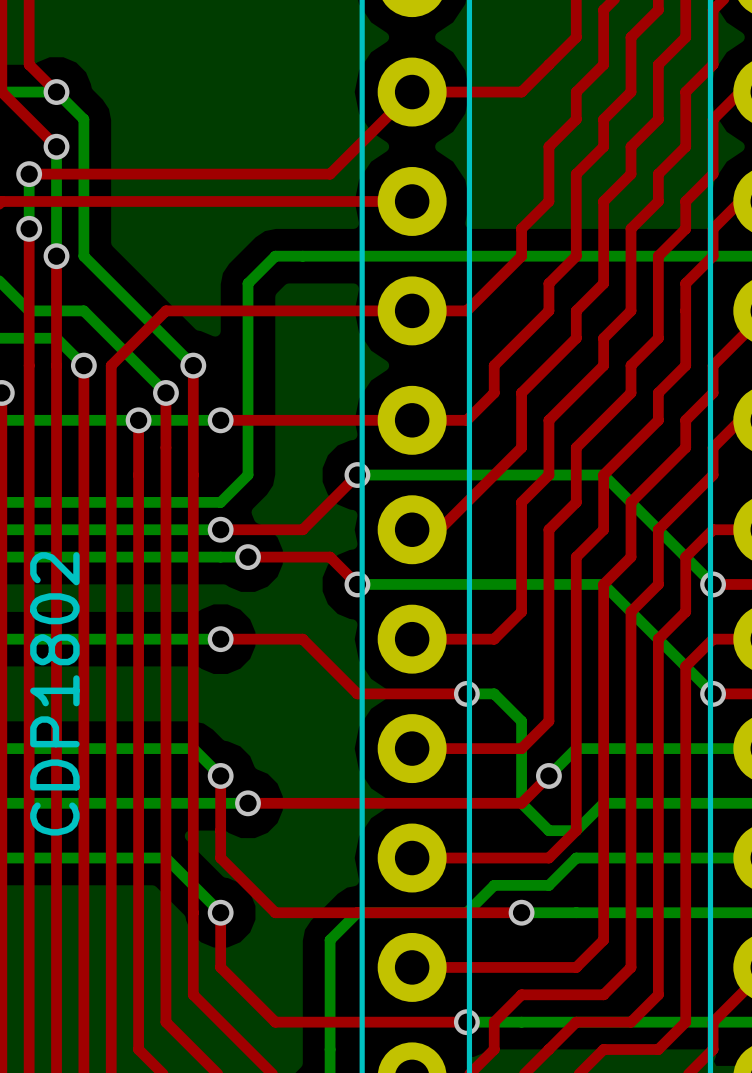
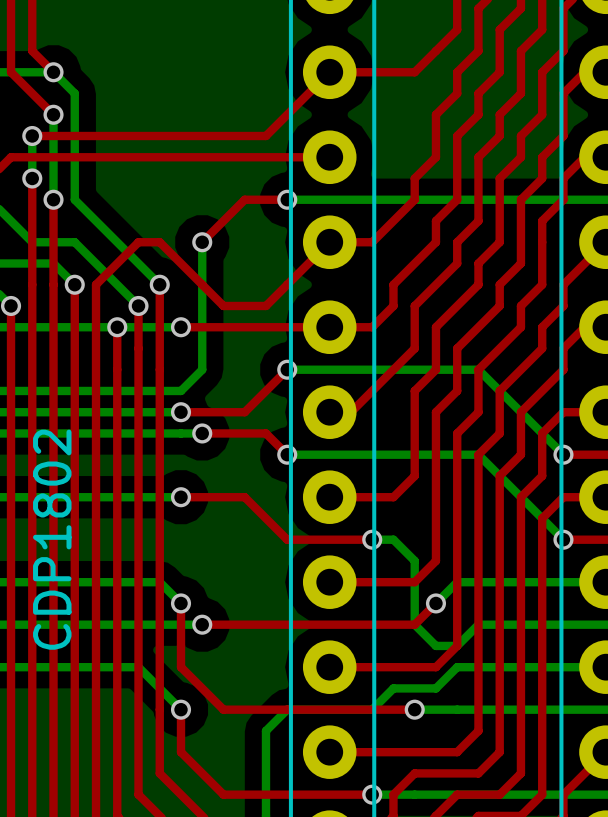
top track: none -> (287, 199) (244, 199) (202, 242)
bottom track: (357, 256) (275, 256) (248, 283) (248, 310) -> none
via: none -> (287, 199)
top track: (193, 310) (412, 310) -> (159, 242) (223, 305) (265, 305) (329, 242)
via: none -> (202, 242)

